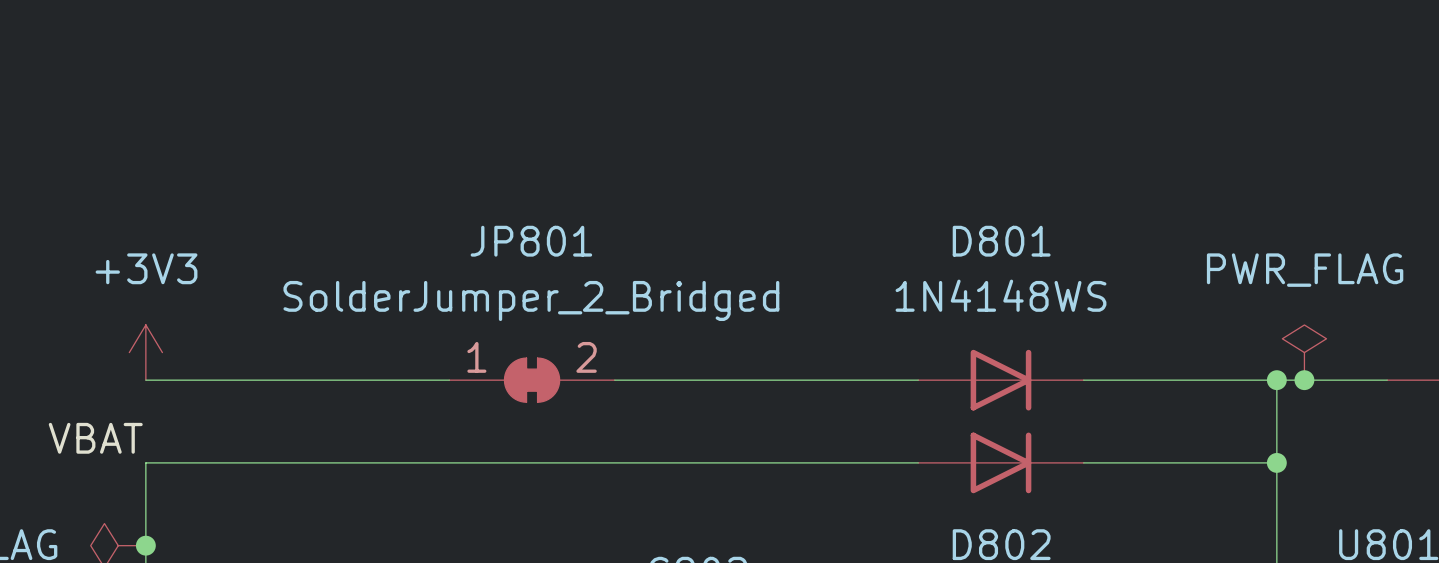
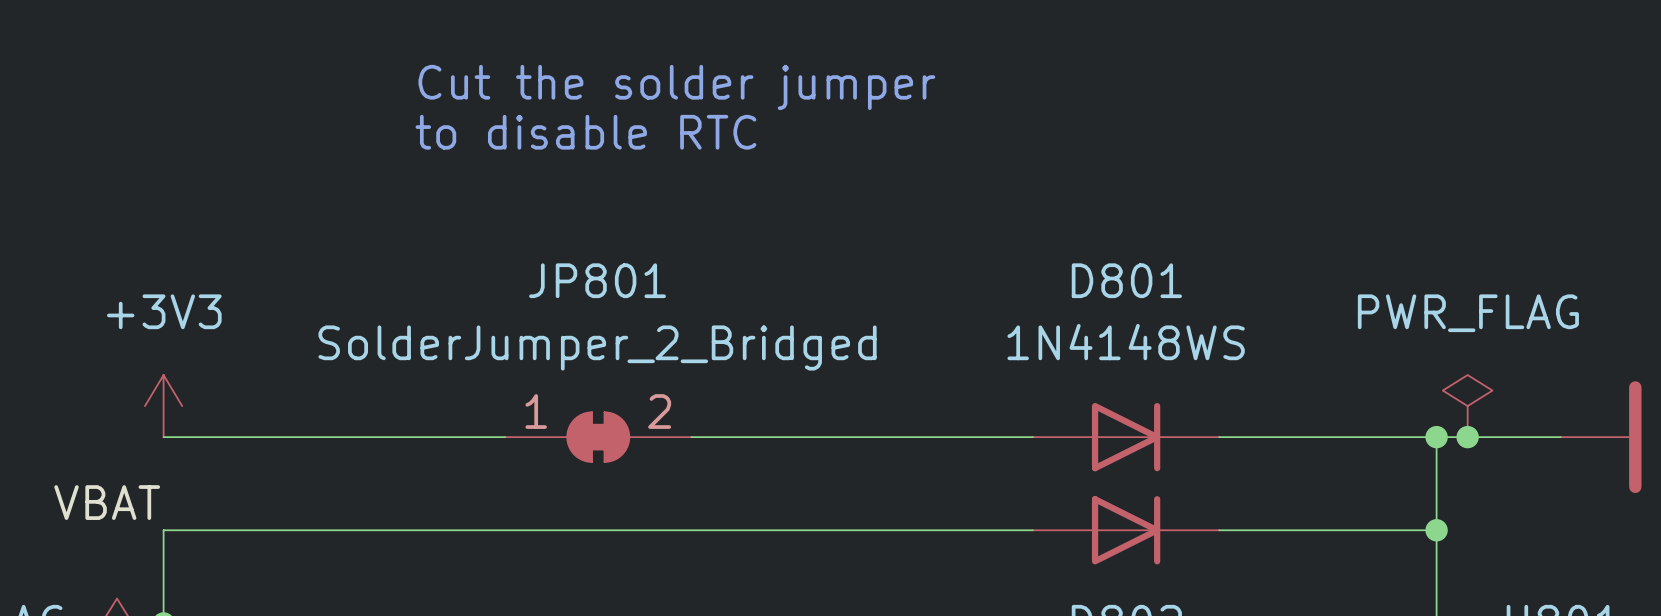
text: none -> Cut the solder jumper (676, 87)
text: none -> to disable RTC (585, 132)

